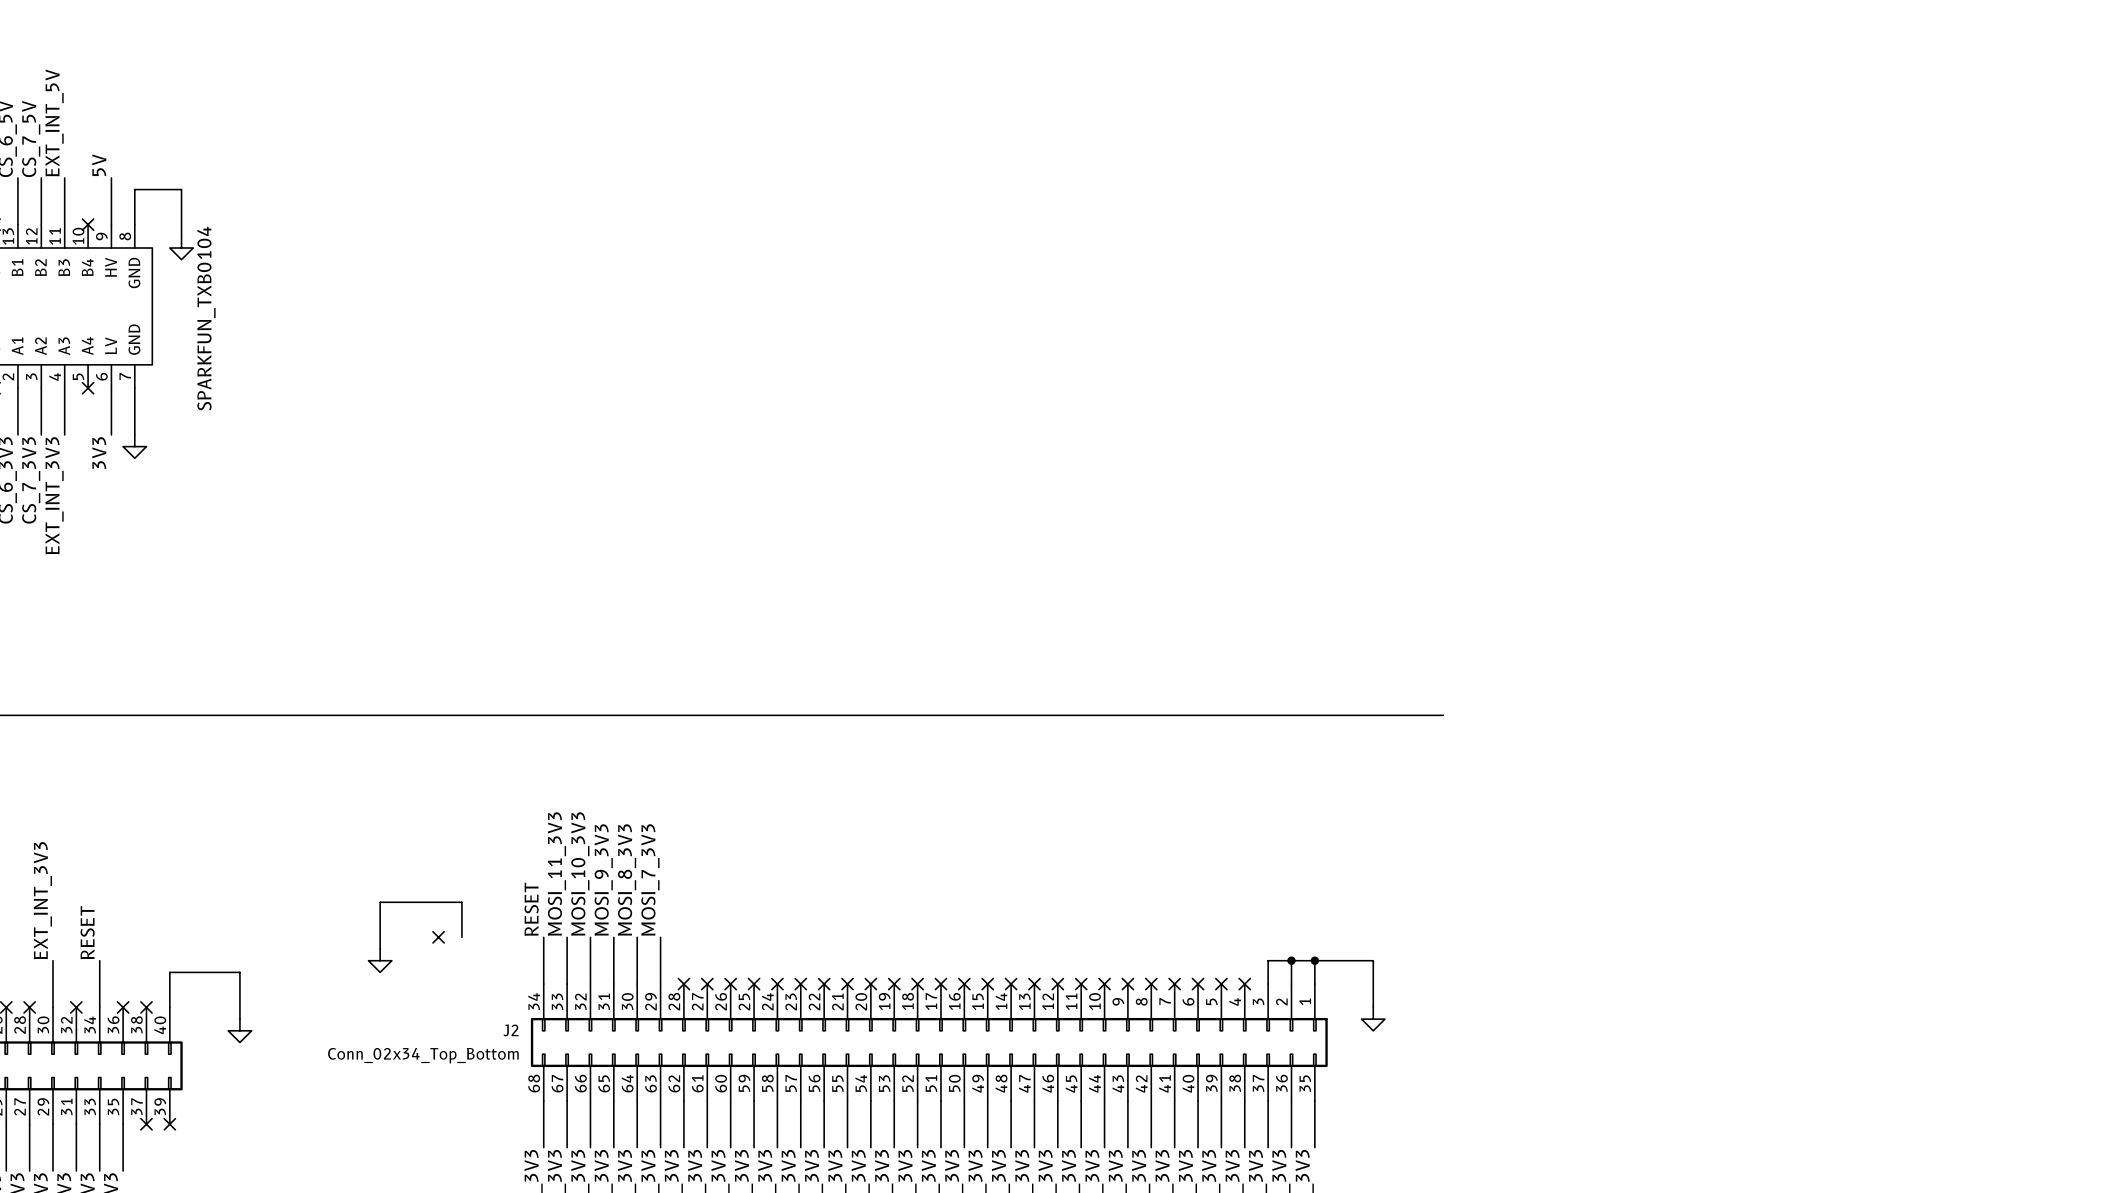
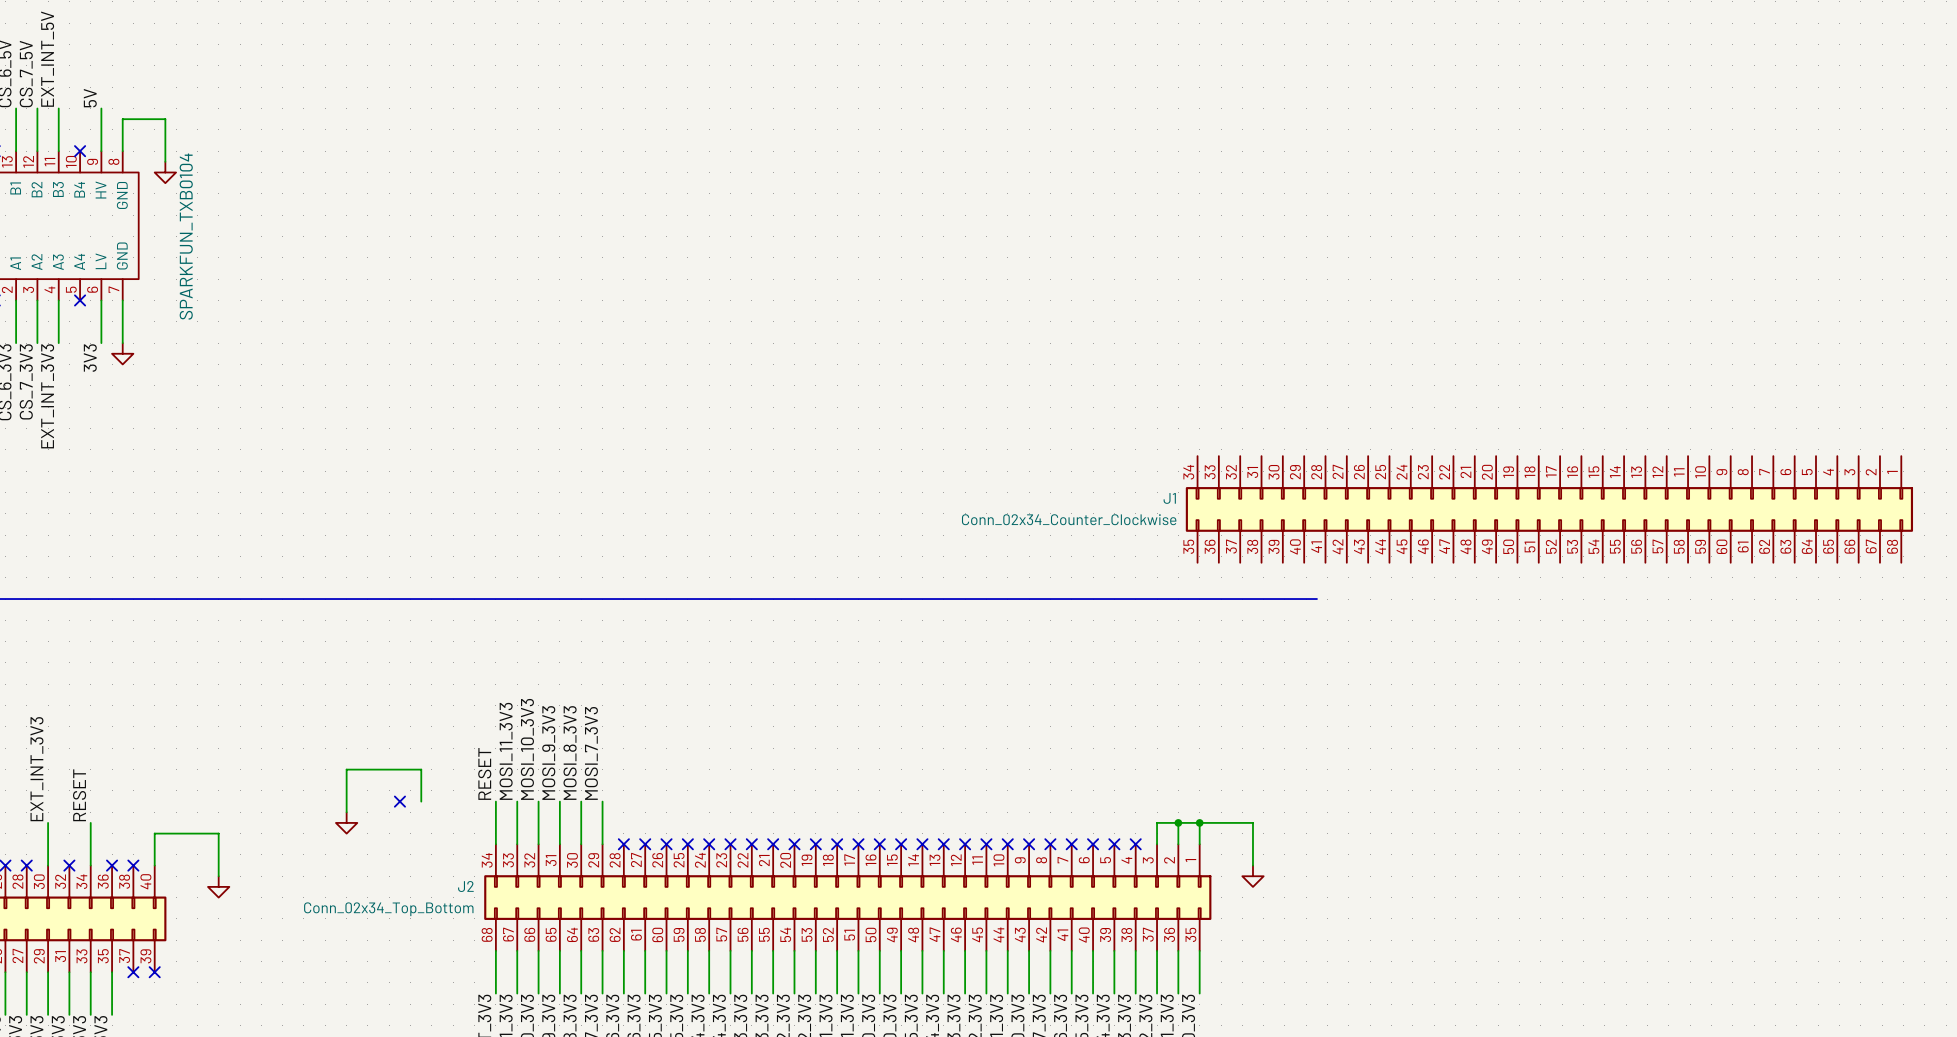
J1: none -> Conn_02x34_Counter_Clockwise (1549, 509)

